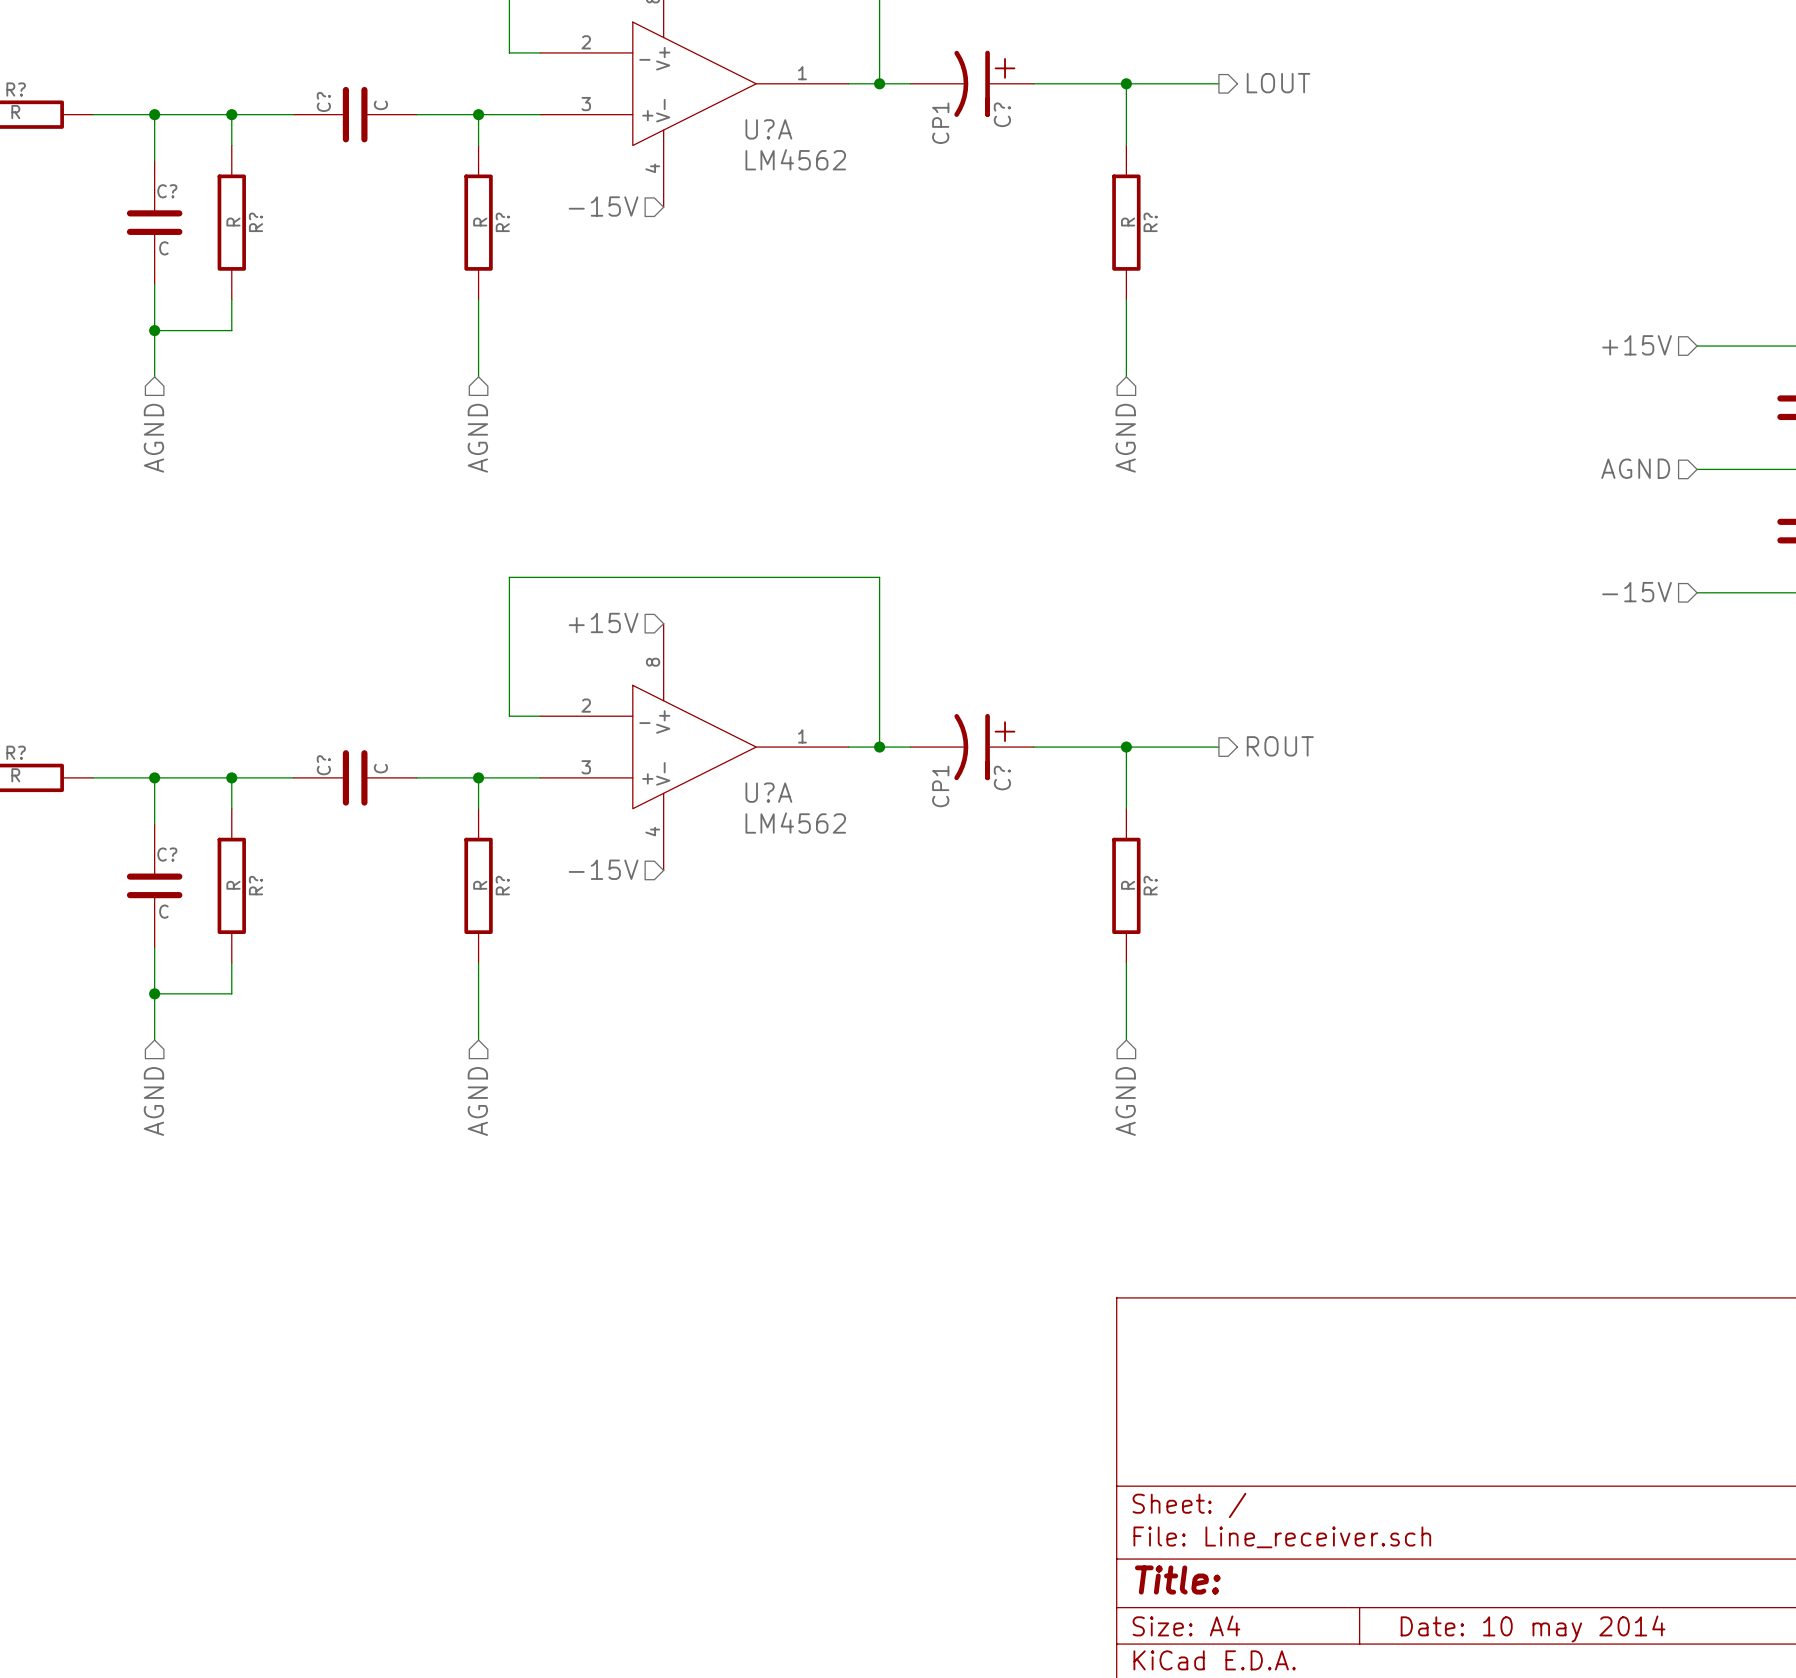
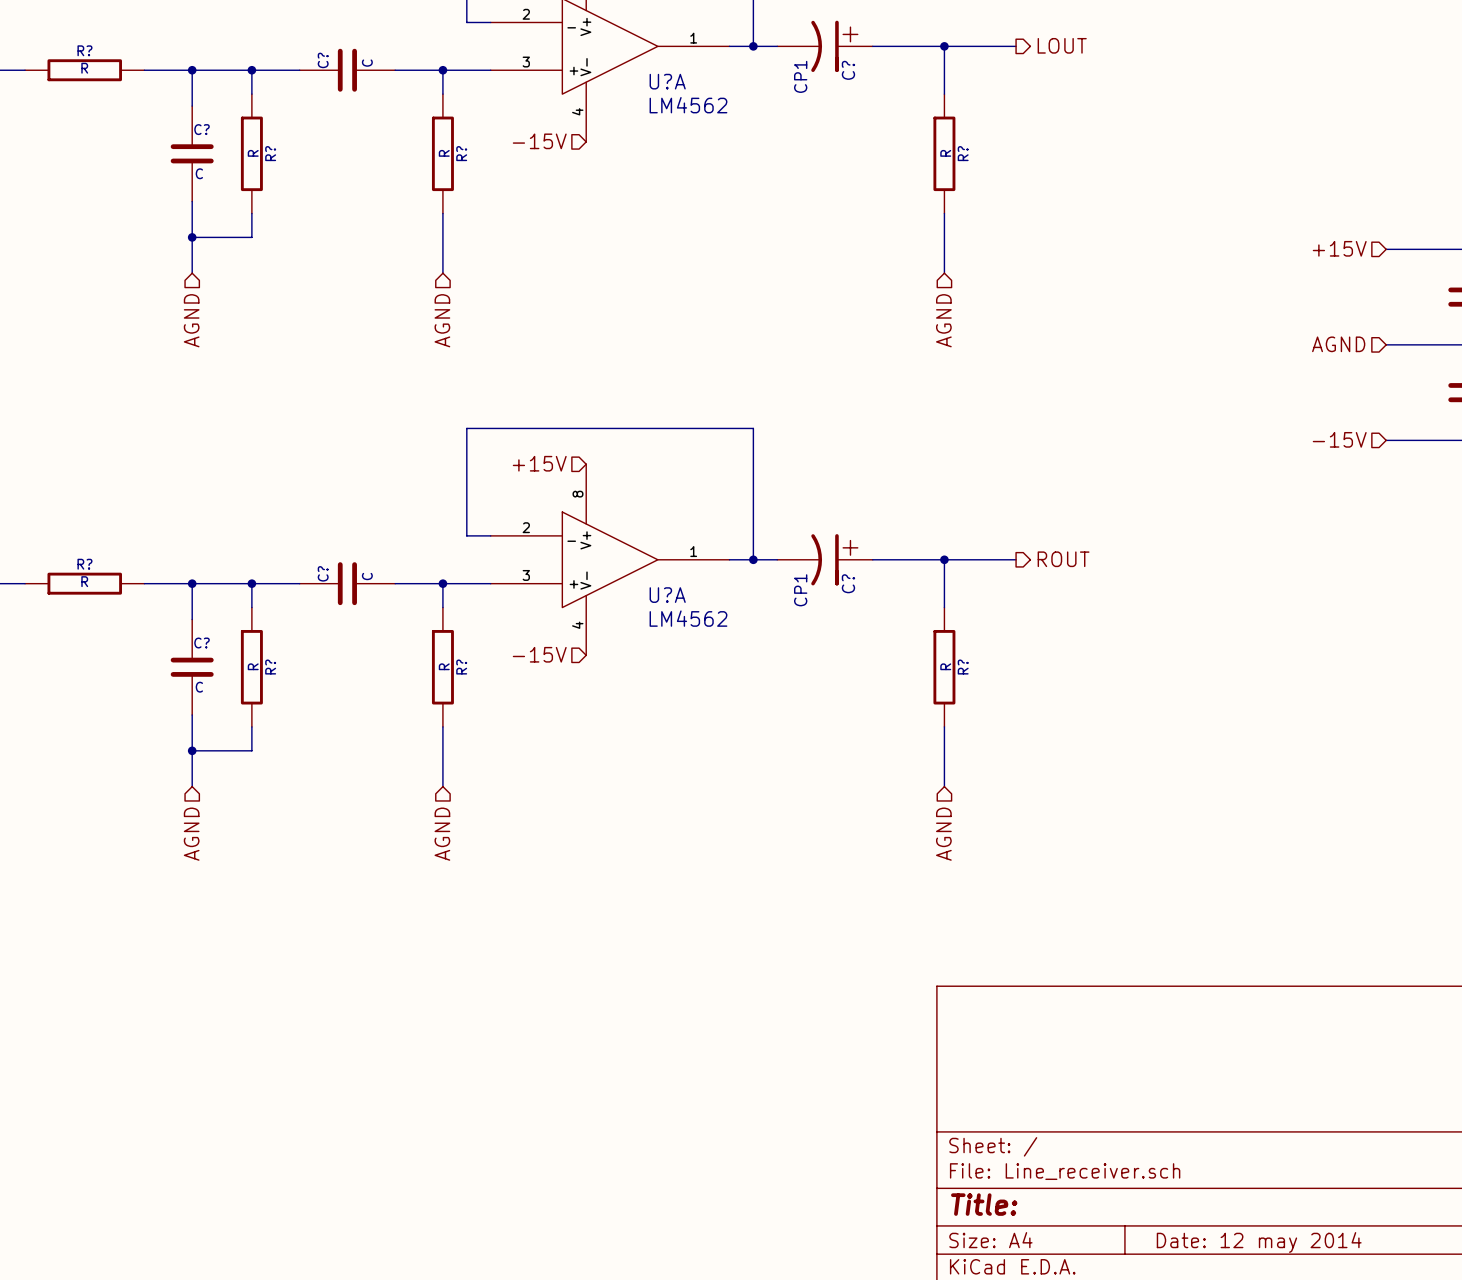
title block: Date: 10 may 2014 (1533, 1628) -> Date: 12 may 2014 (1259, 1242)

